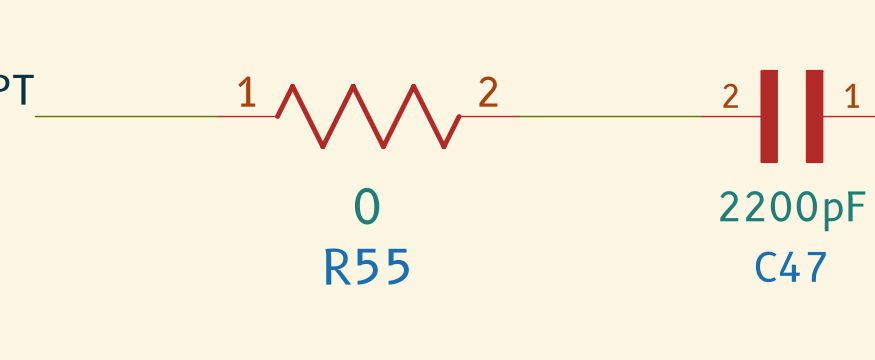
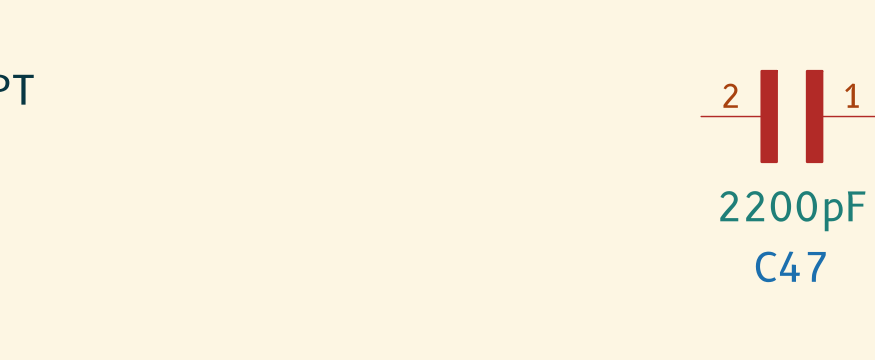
wire: (35, 116) (216, 116) -> none
R55: 0 (368, 116) -> none
wire: (519, 116) (701, 116) -> none

